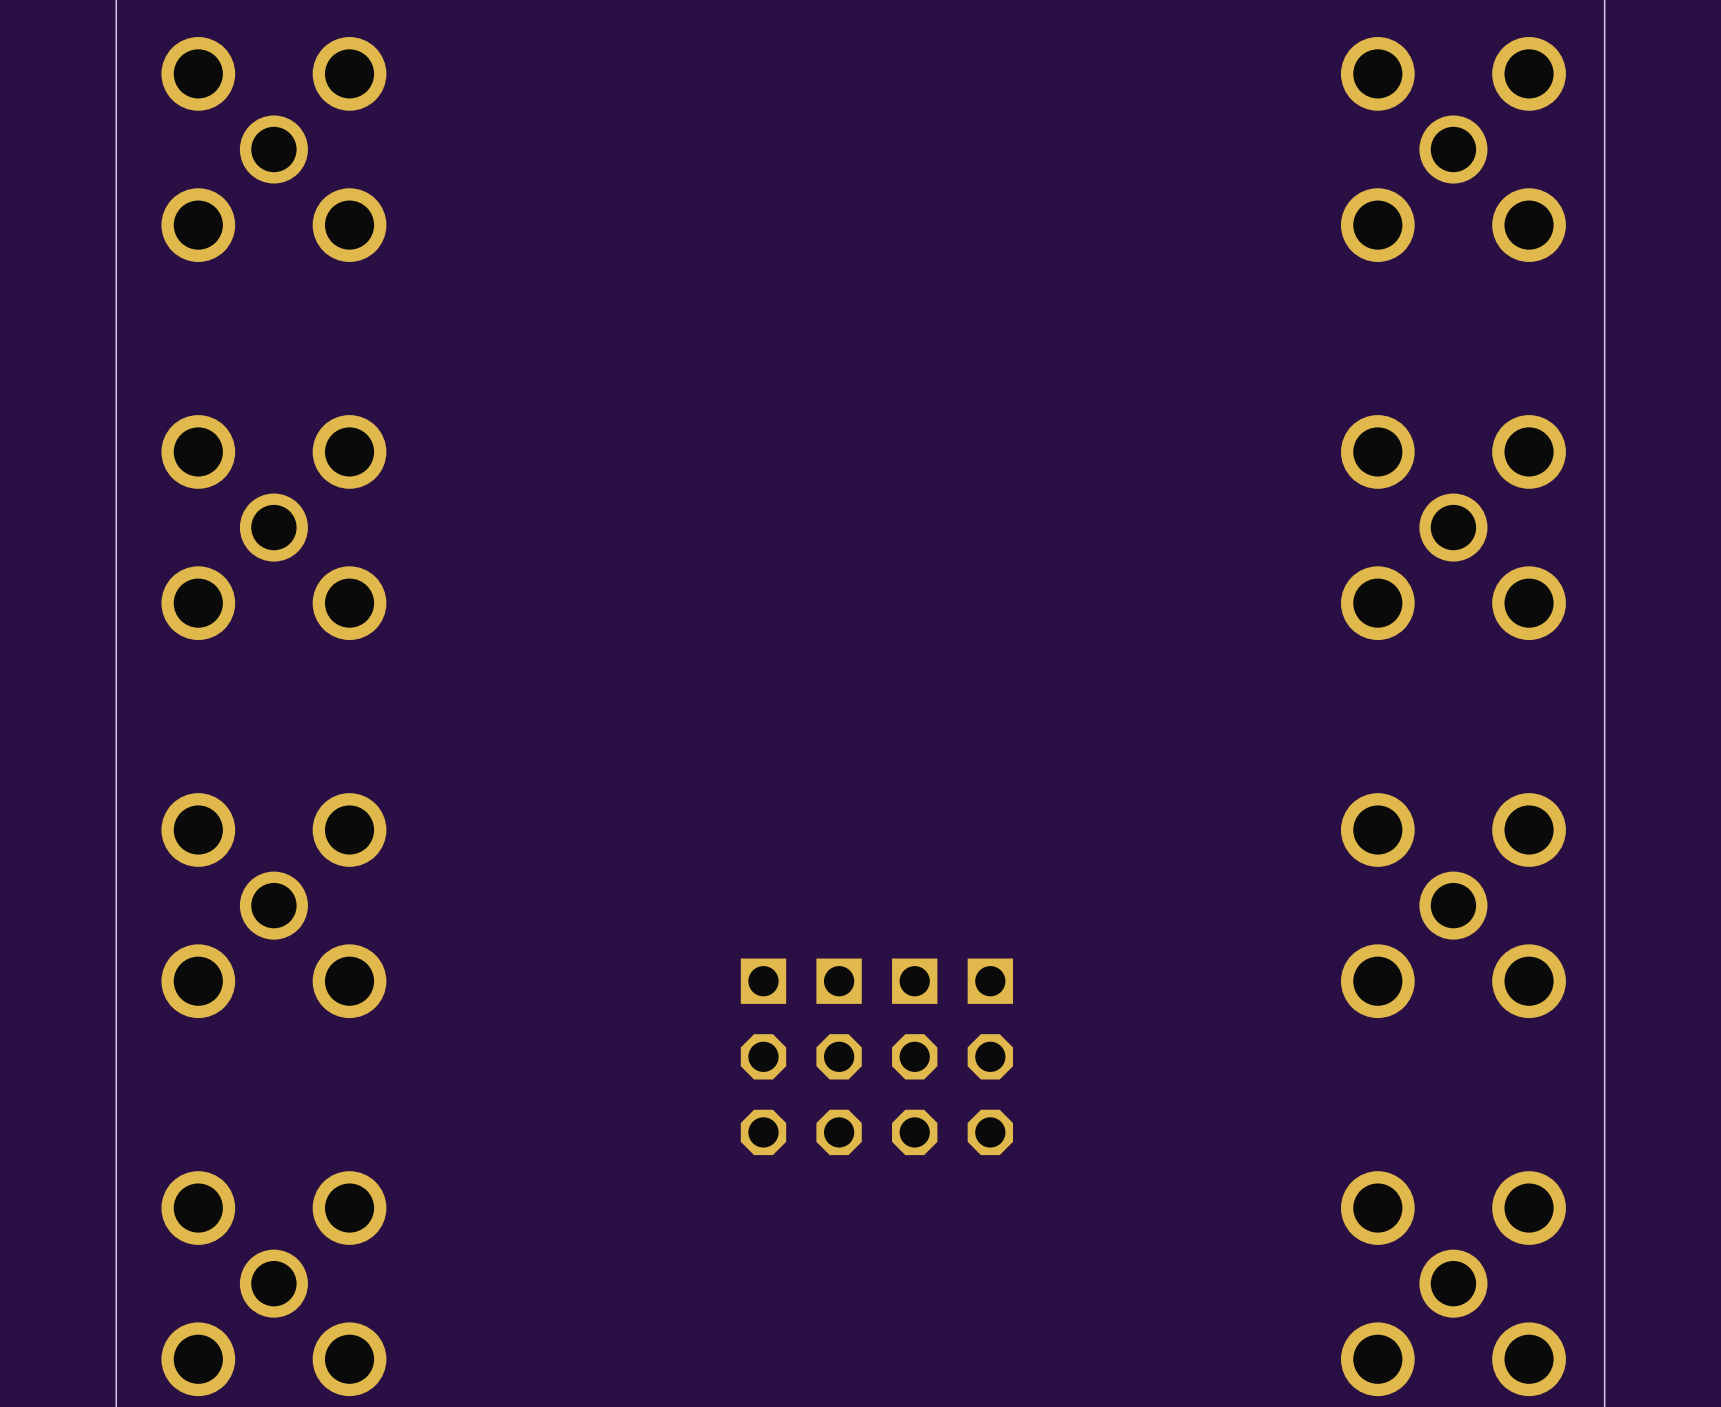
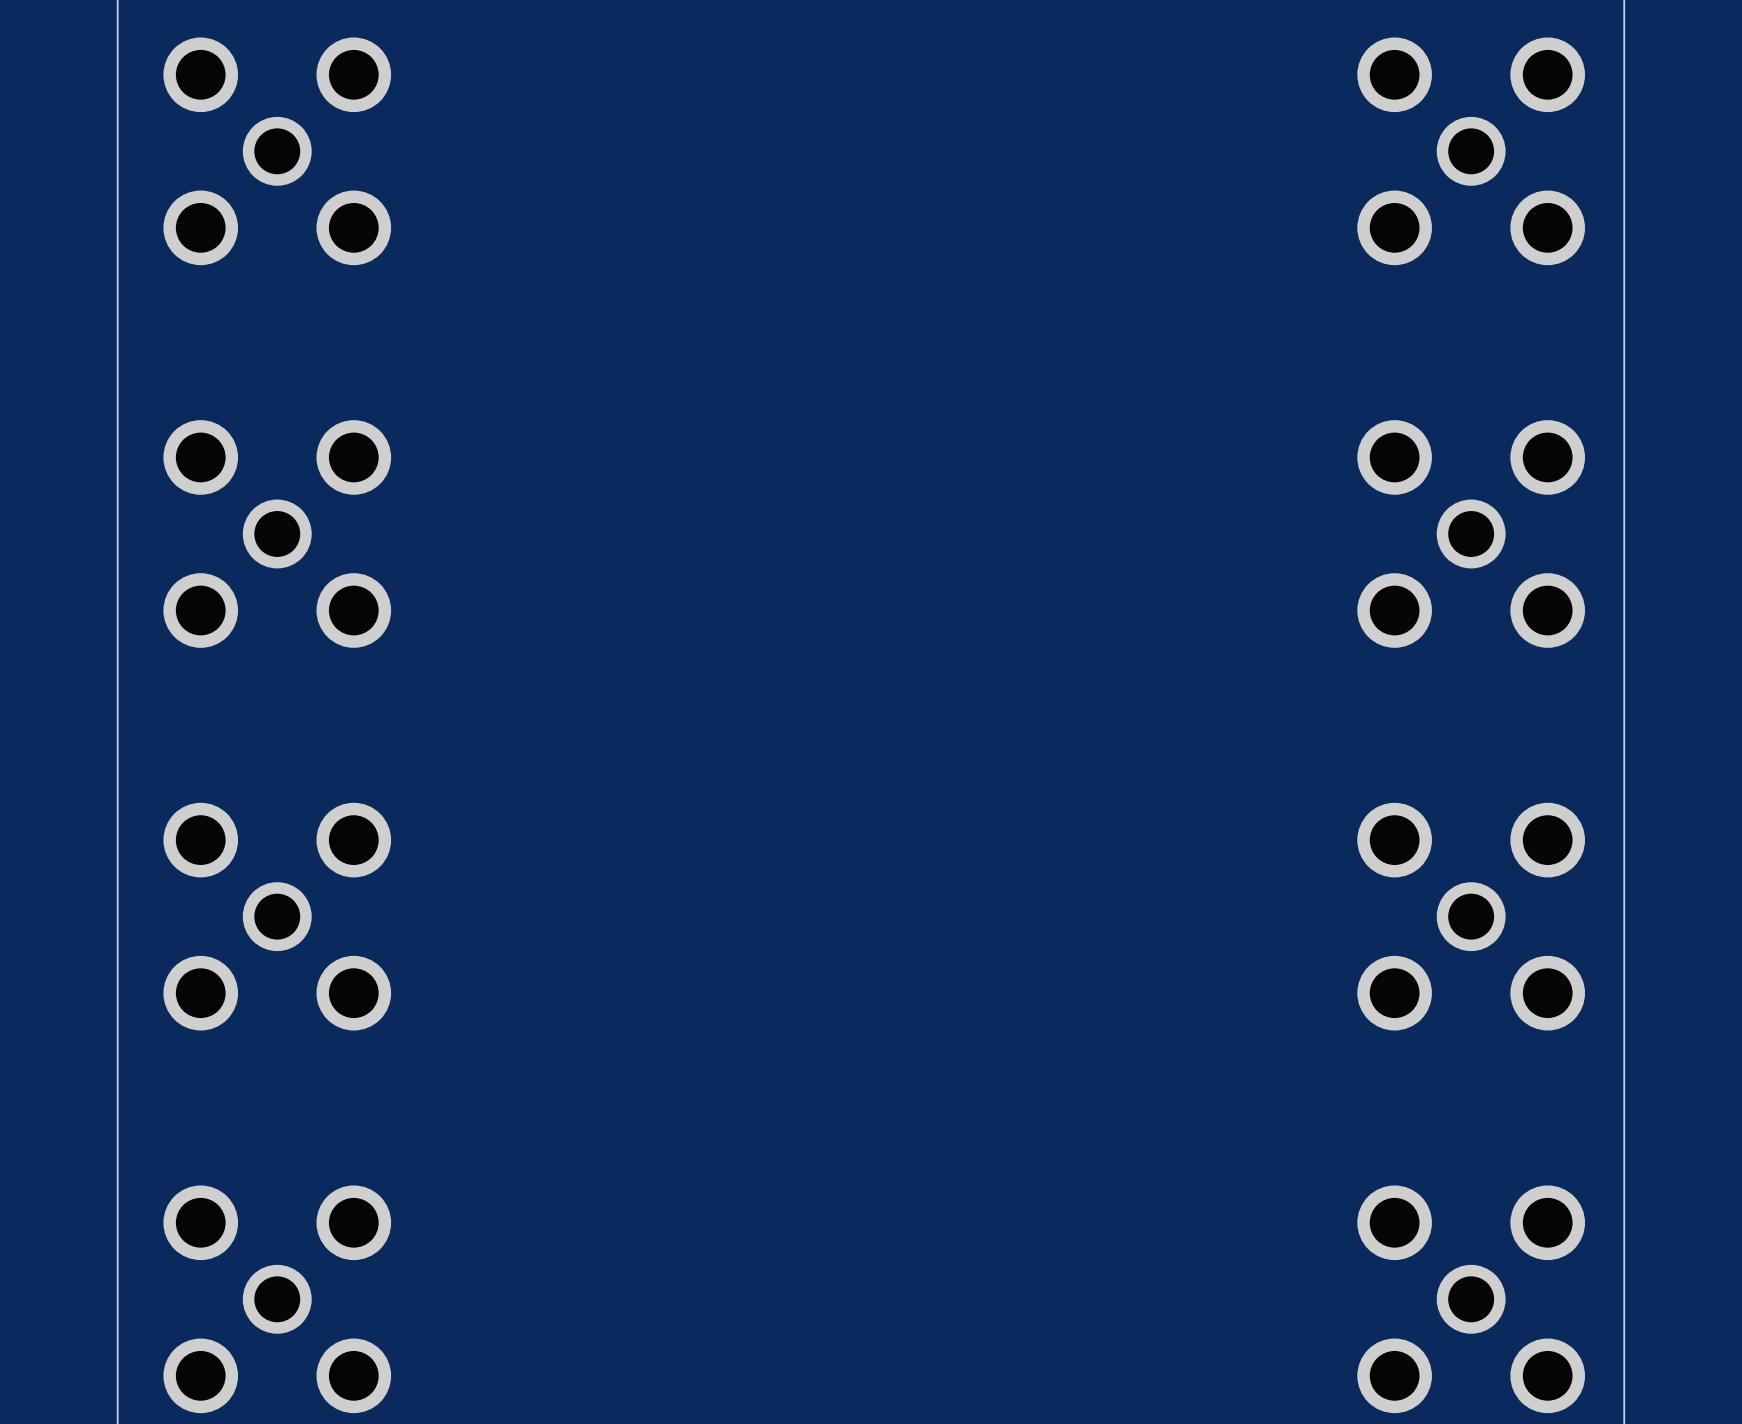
part: (763, 1056) -> none
part: (839, 1056) -> none
part: (914, 1056) -> none
part: (990, 1056) -> none

